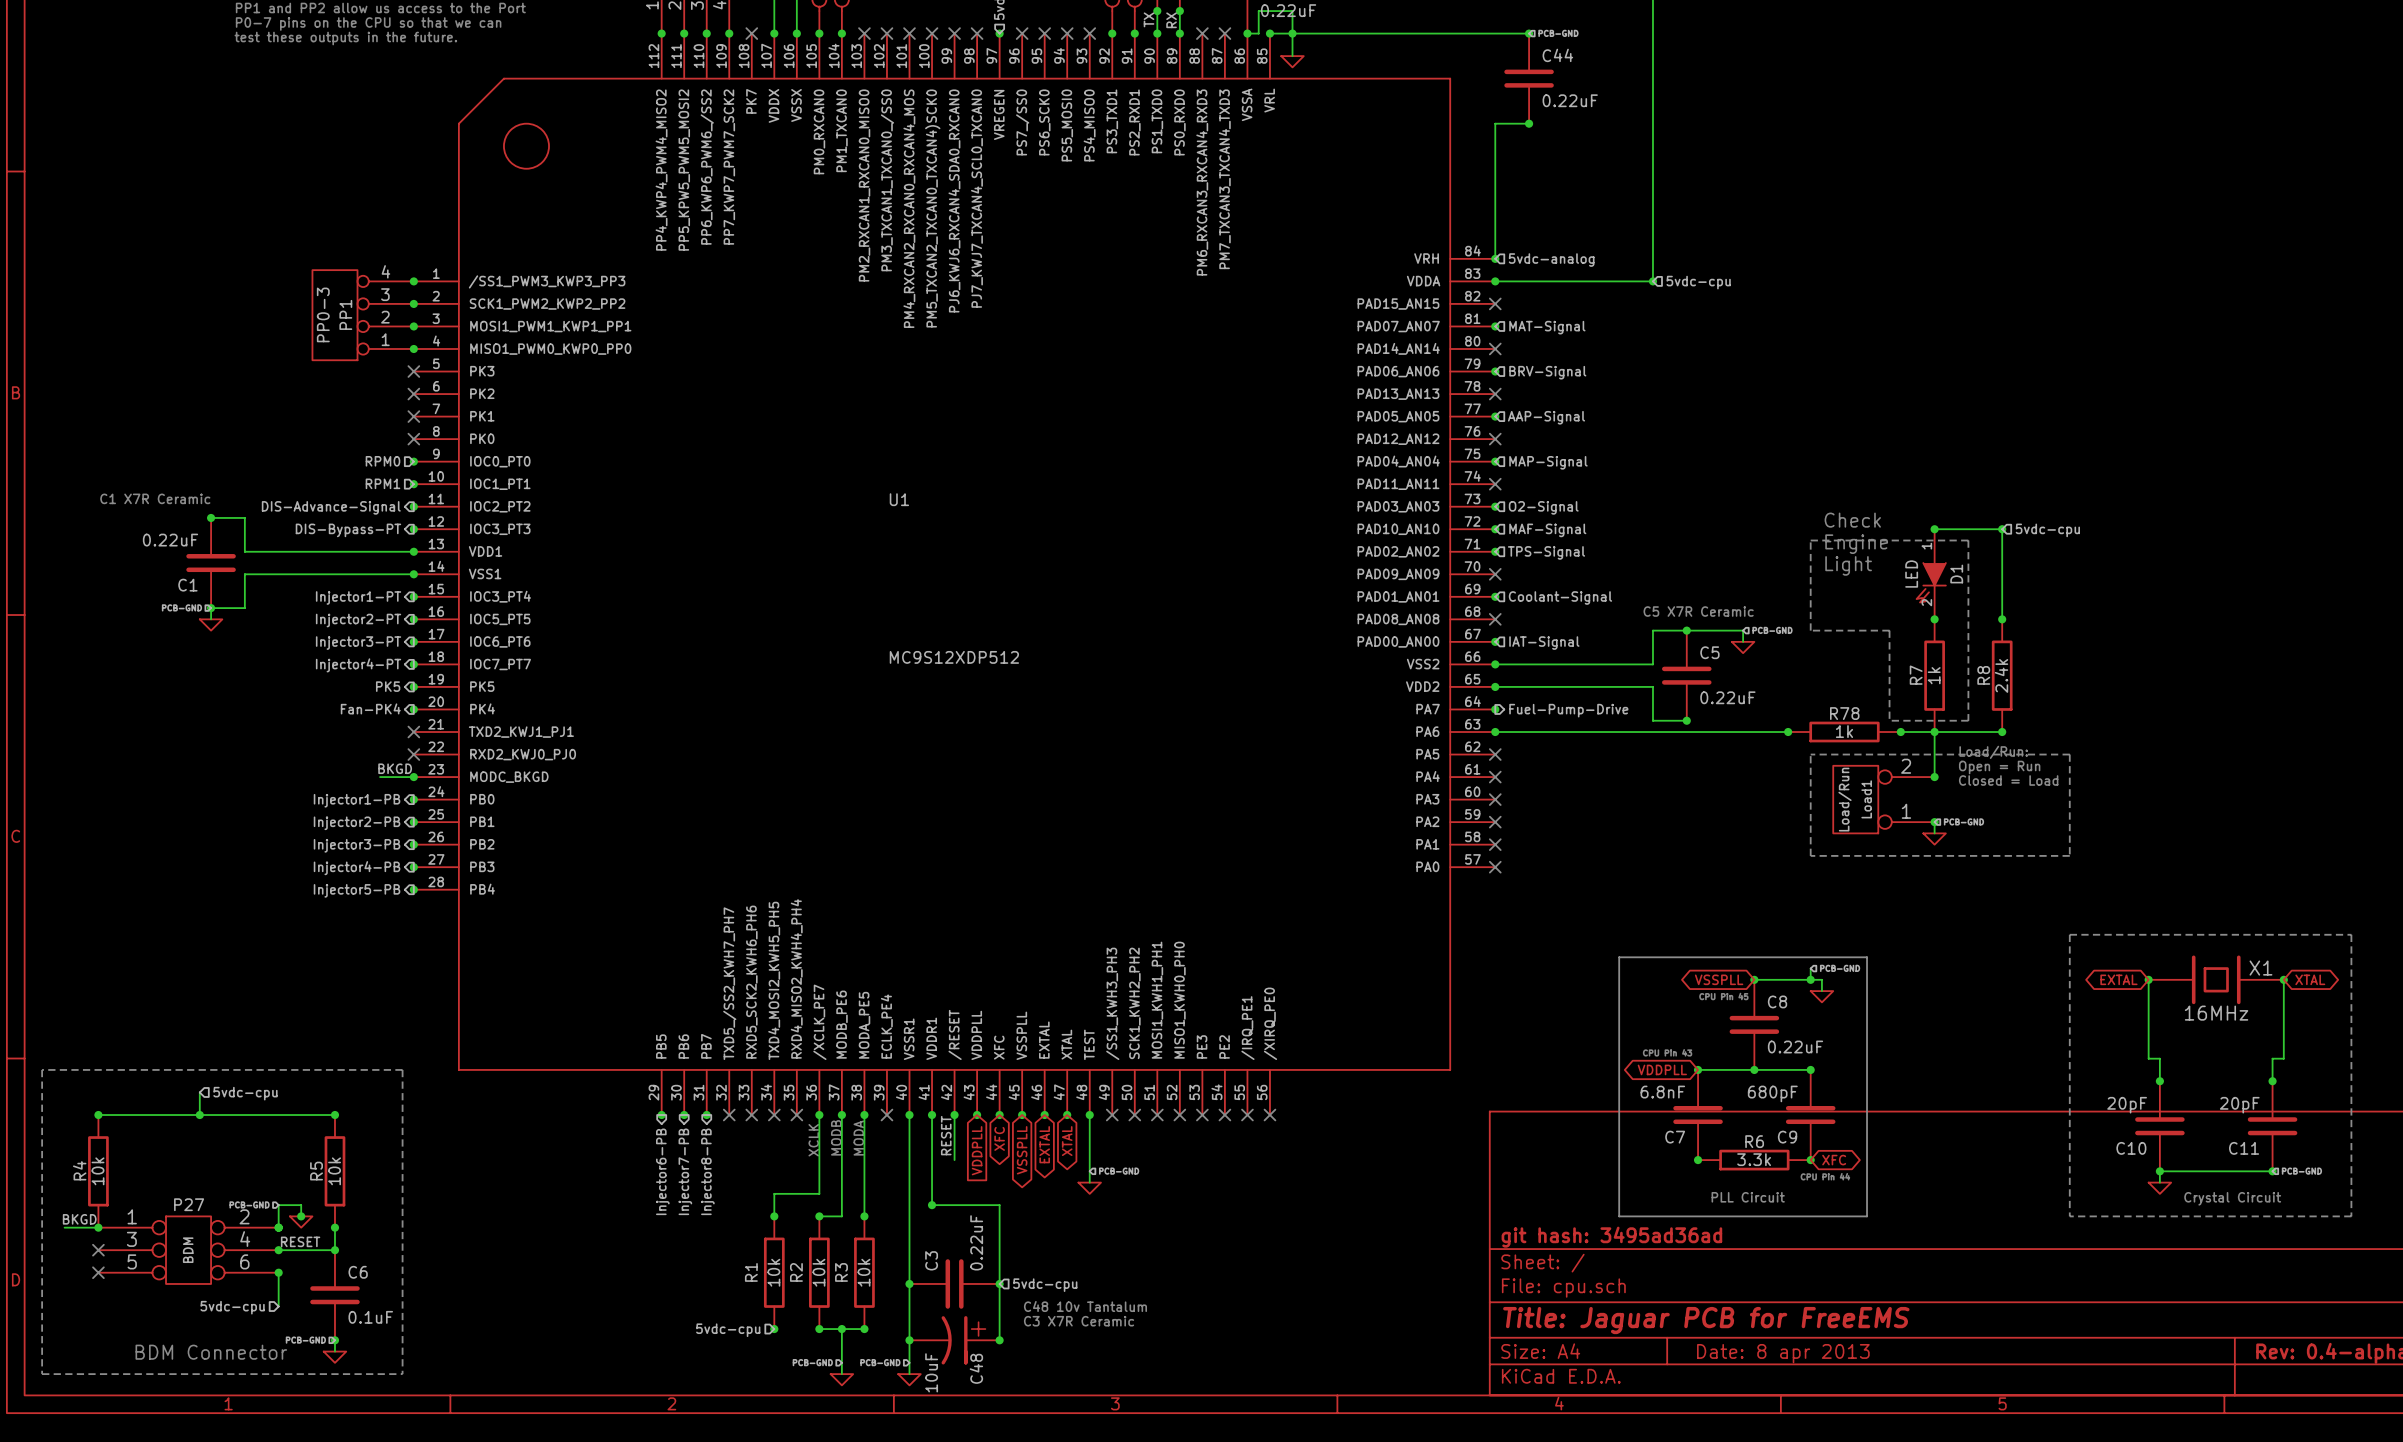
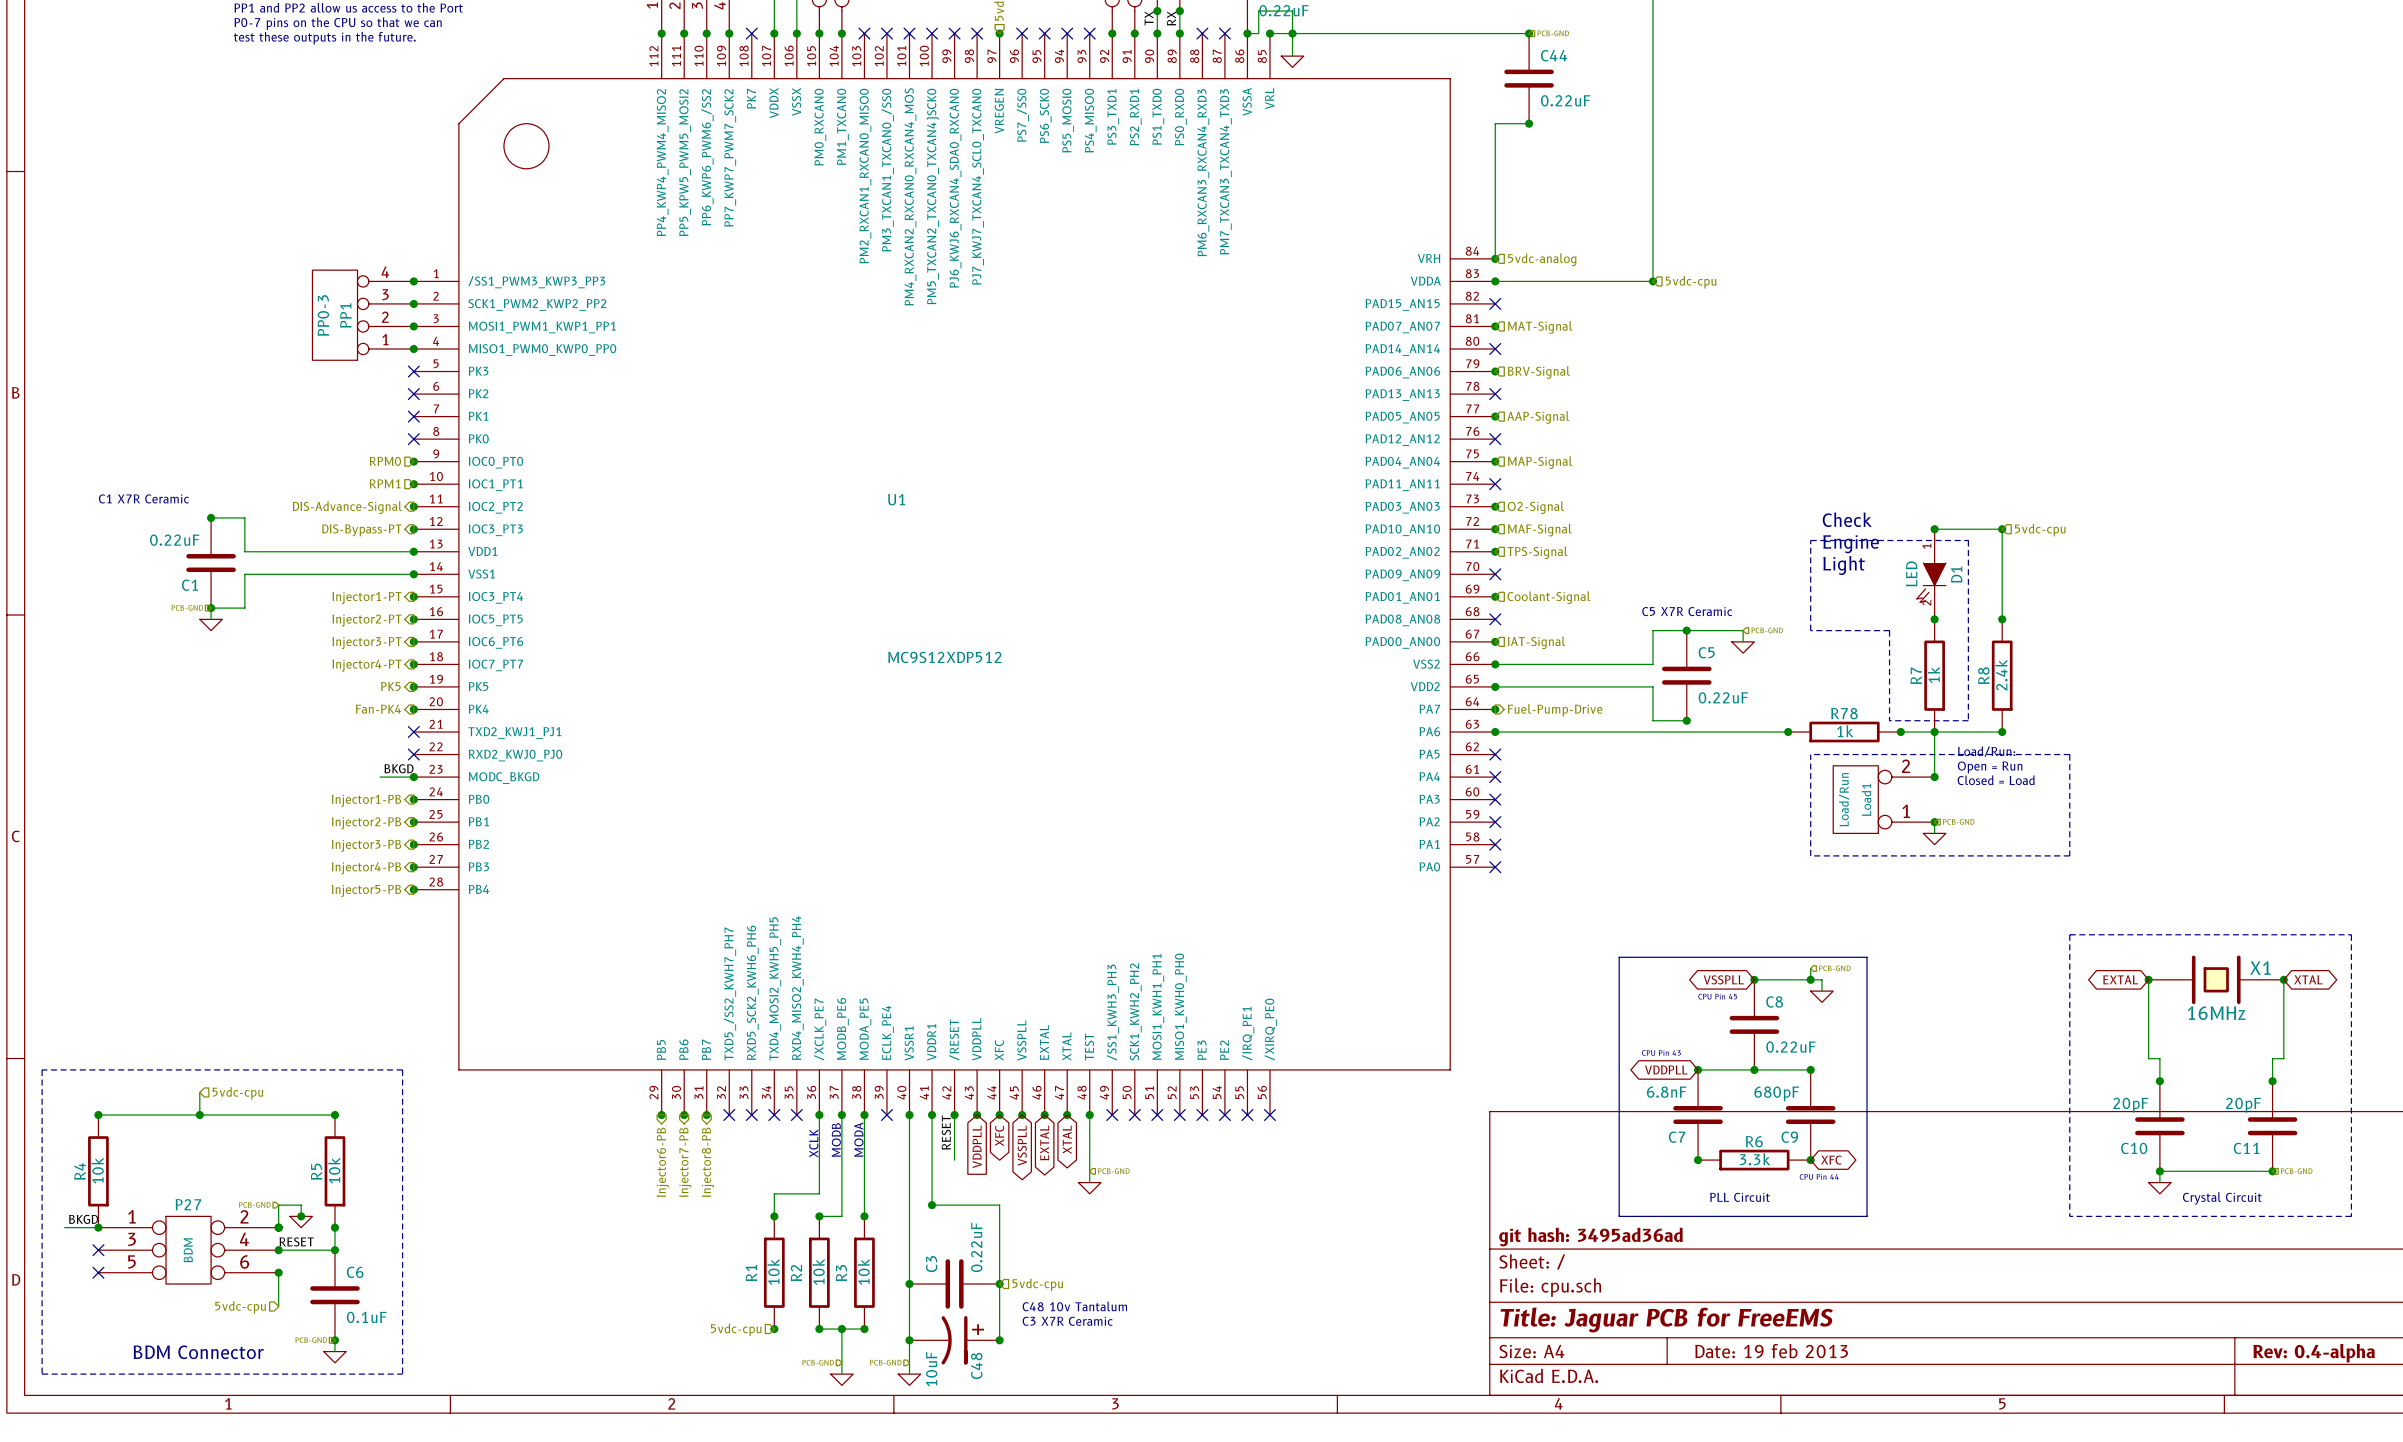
title block: Date: 8 apr 2013 (1783, 1353) -> Date: 19 feb 2013 (1771, 1351)

